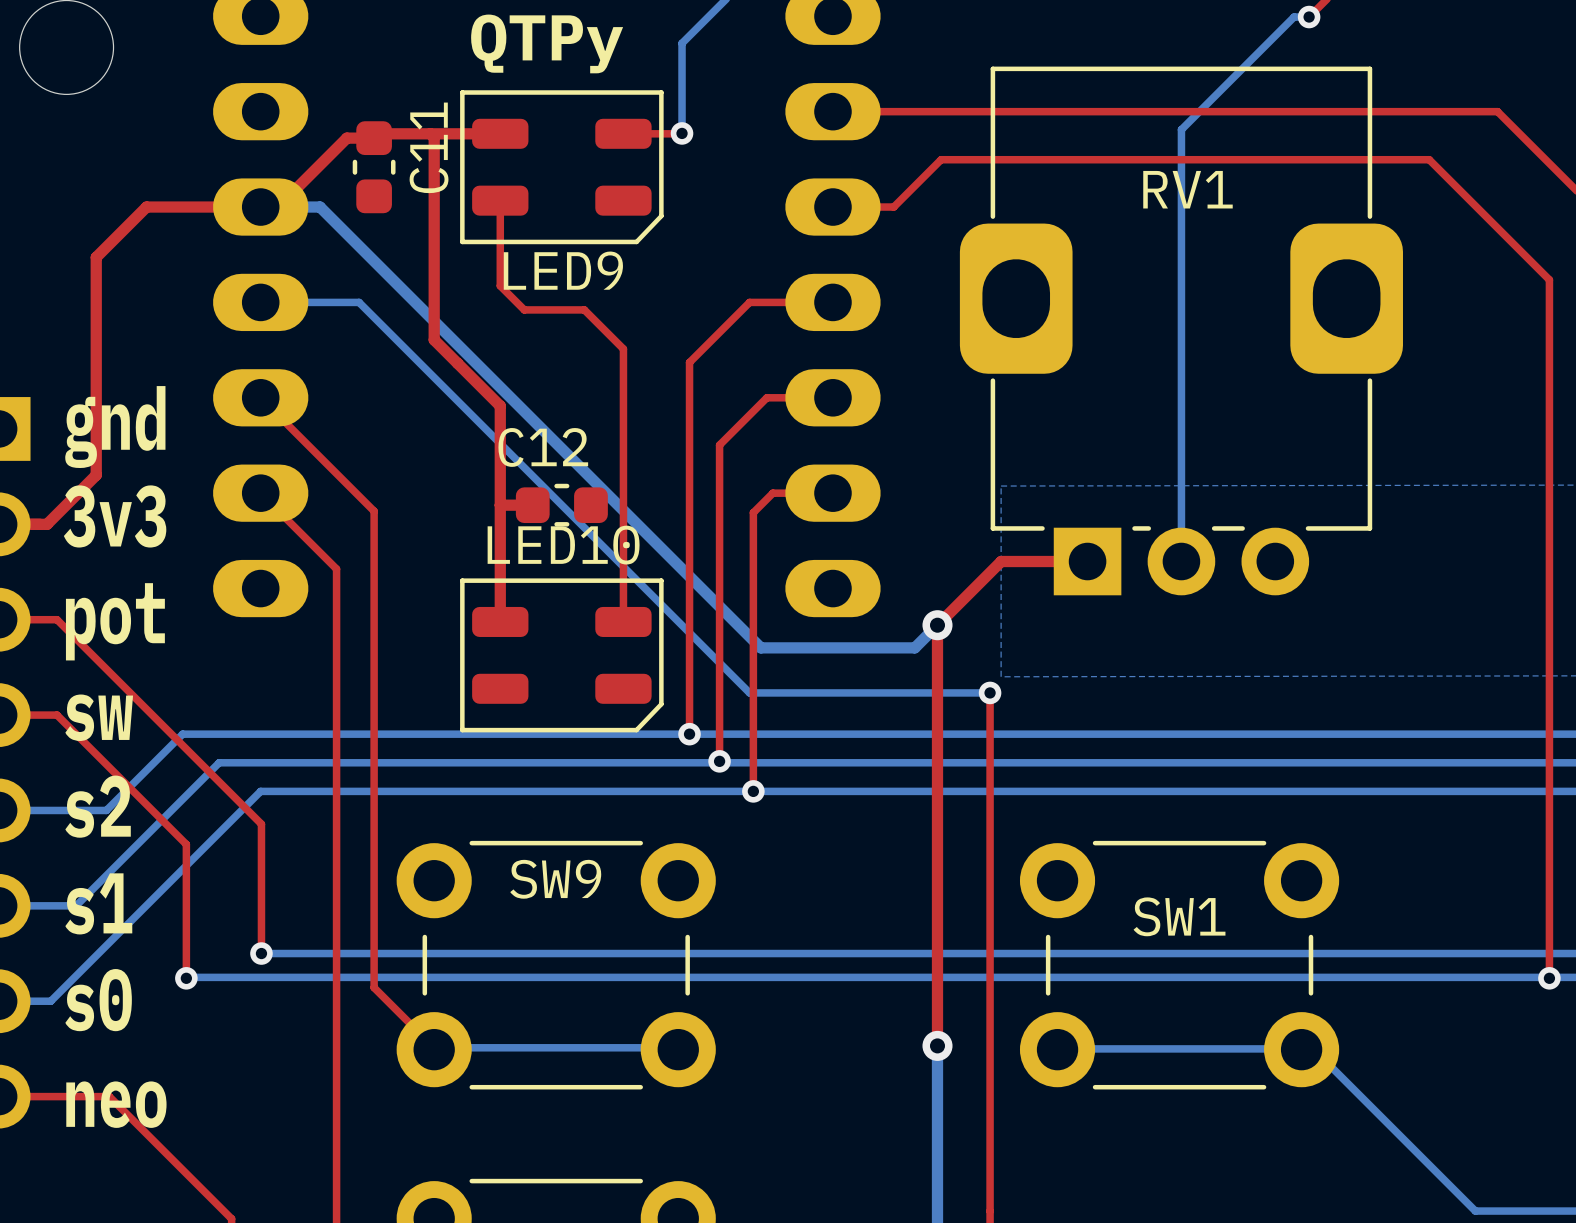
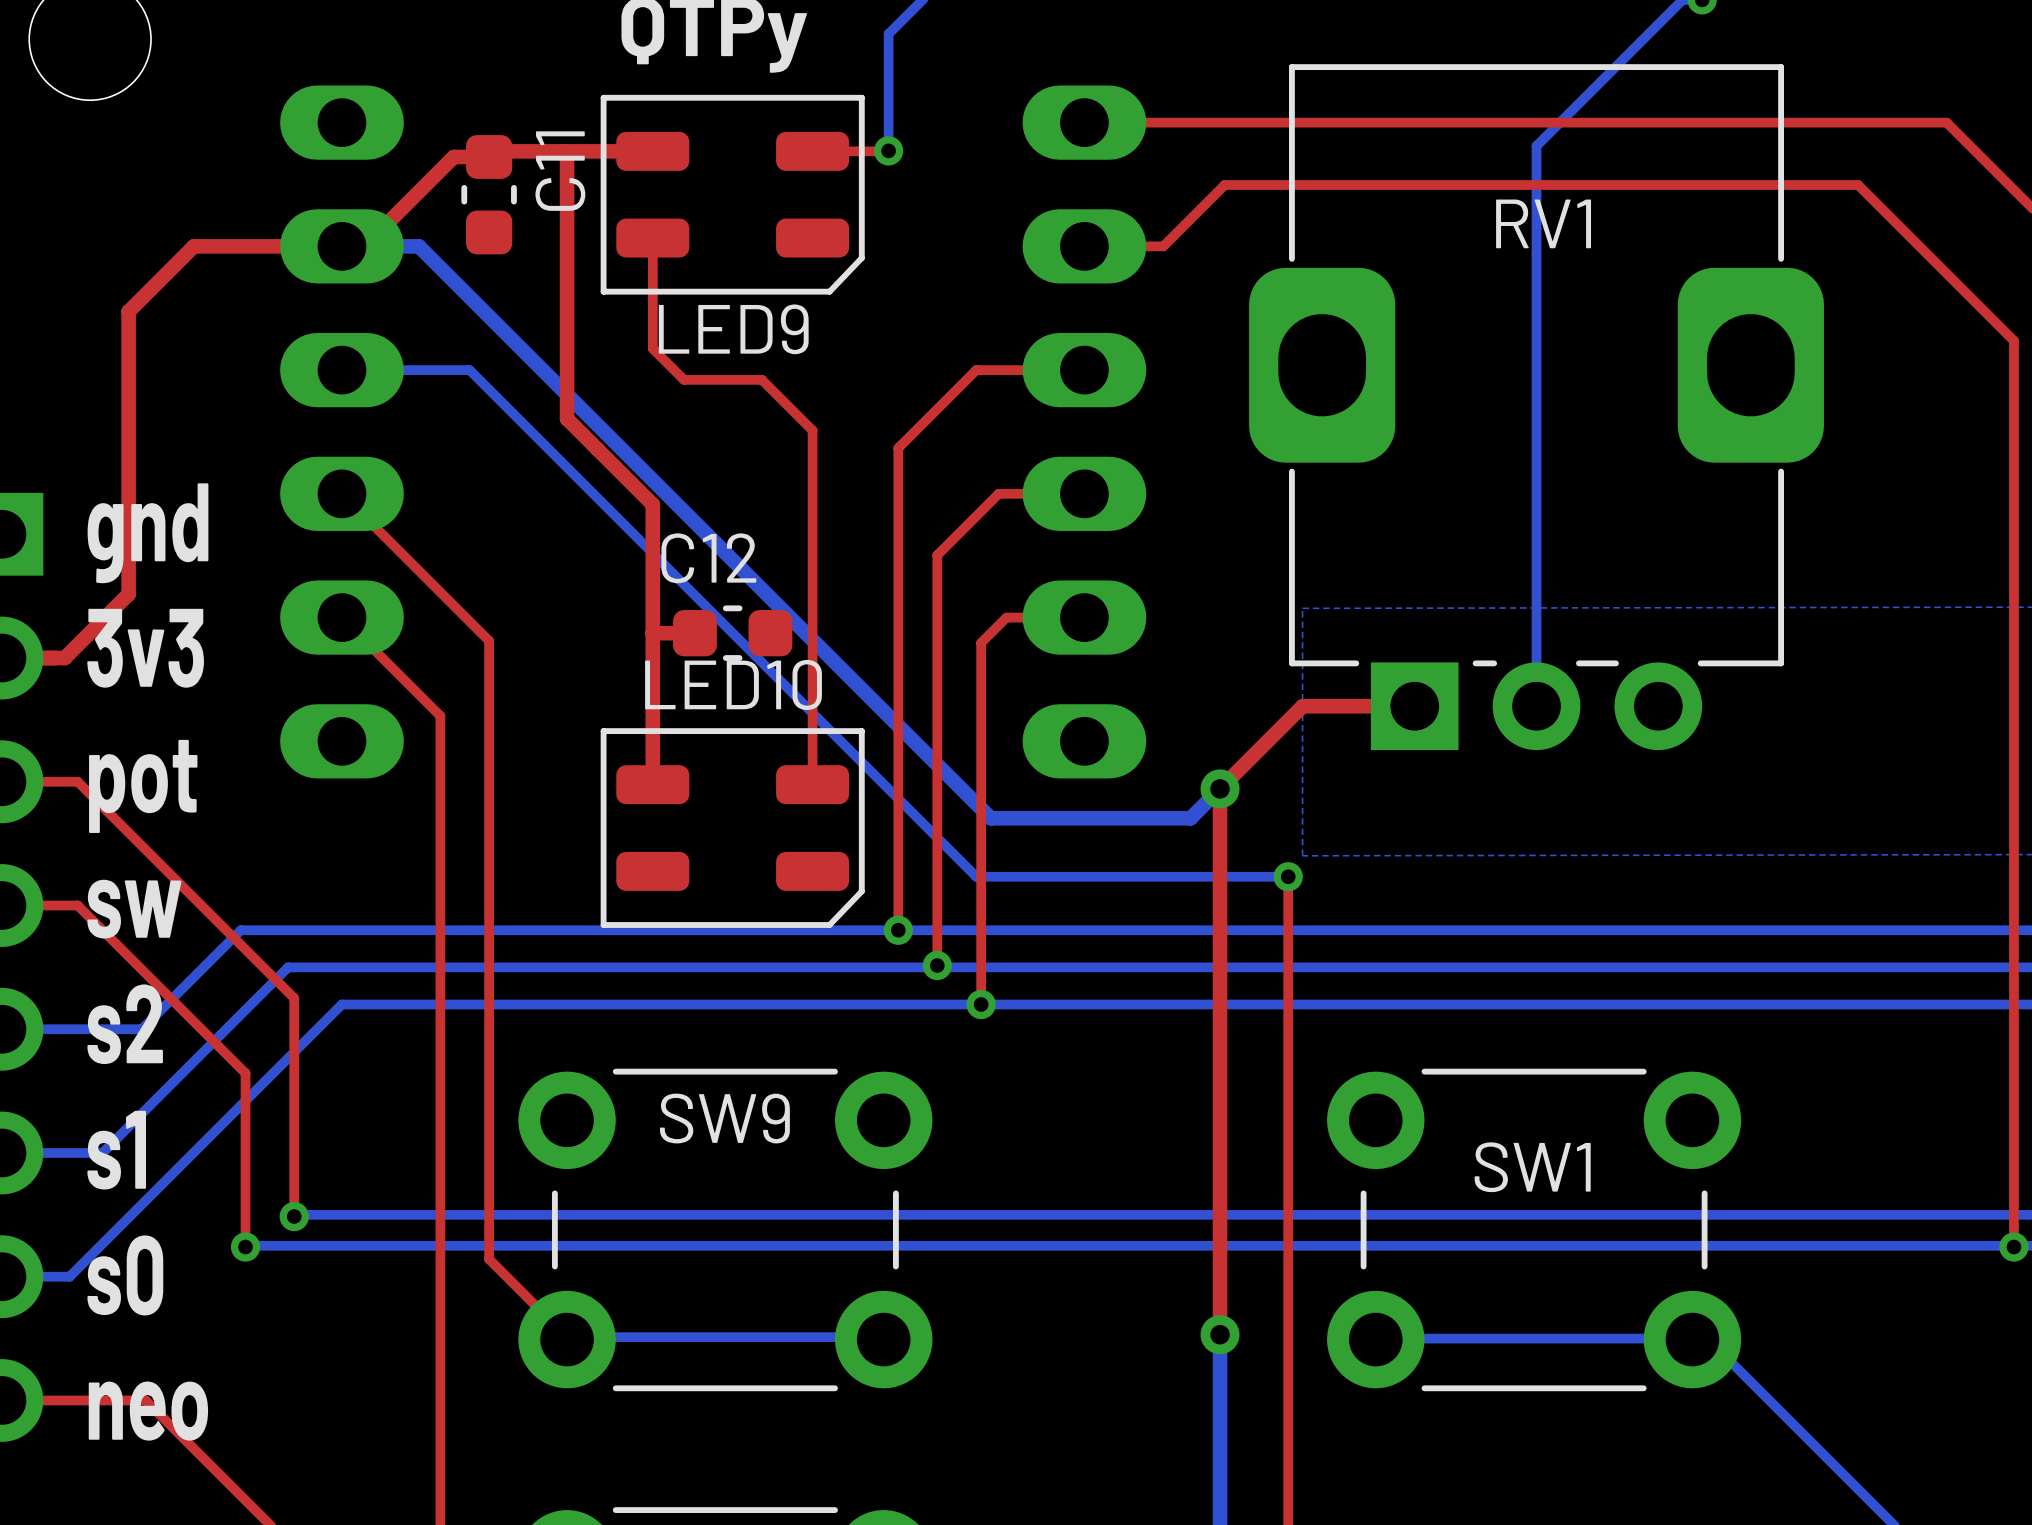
top track: (223, 786) (261, 824) (261, 953) -> (294, 998) (294, 1216)
bottom track: none -> (342, 1214) (295, 1214) (294, 1216)
via position: (261, 953) -> (294, 1216)

